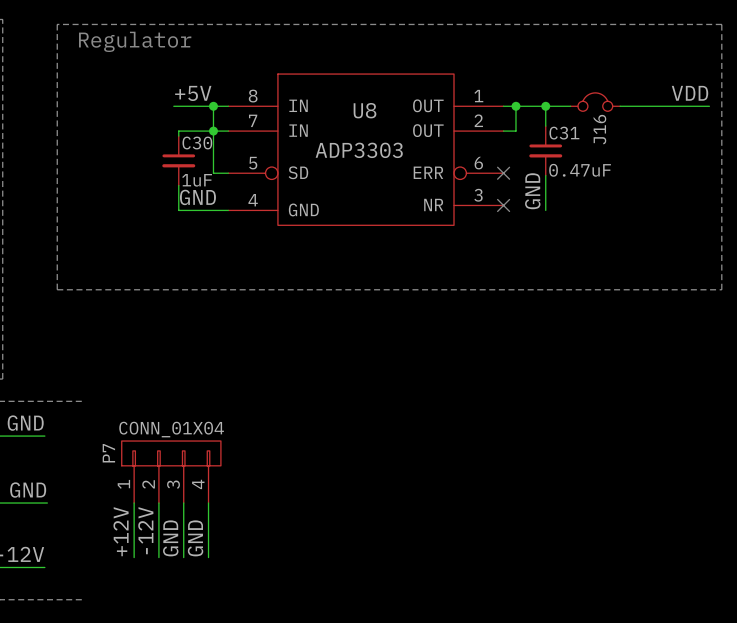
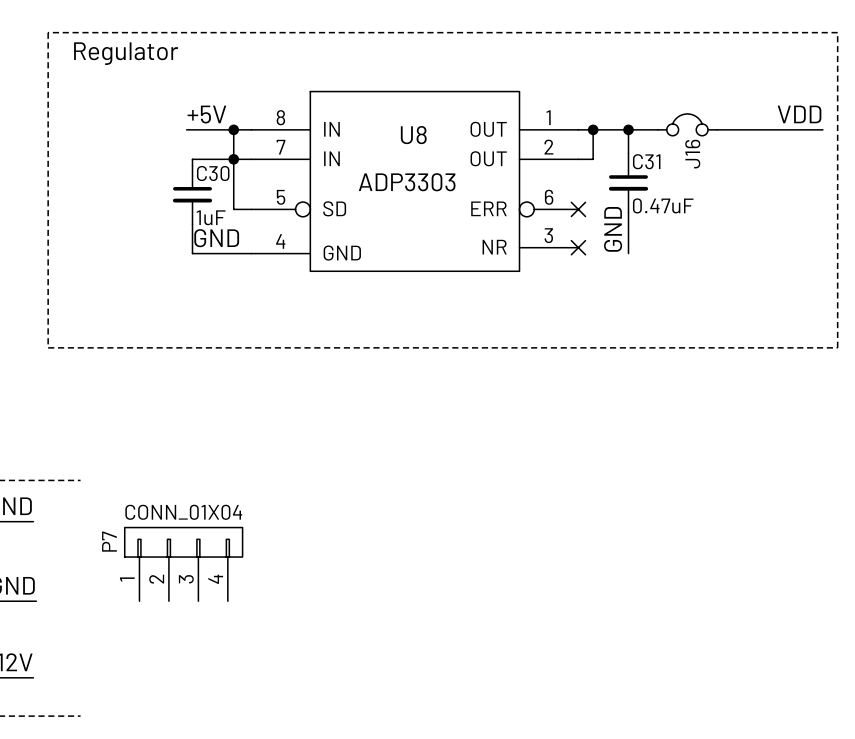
wire: (134, 503) (134, 557) -> none
wire: (158, 503) (158, 557) -> none
wire: (183, 503) (183, 557) -> none
wire: (208, 503) (208, 557) -> none
label: -12V (145, 530) -> none
label: +12V (121, 531) -> none
label: GND (170, 538) -> none
label: GND (195, 538) -> none

